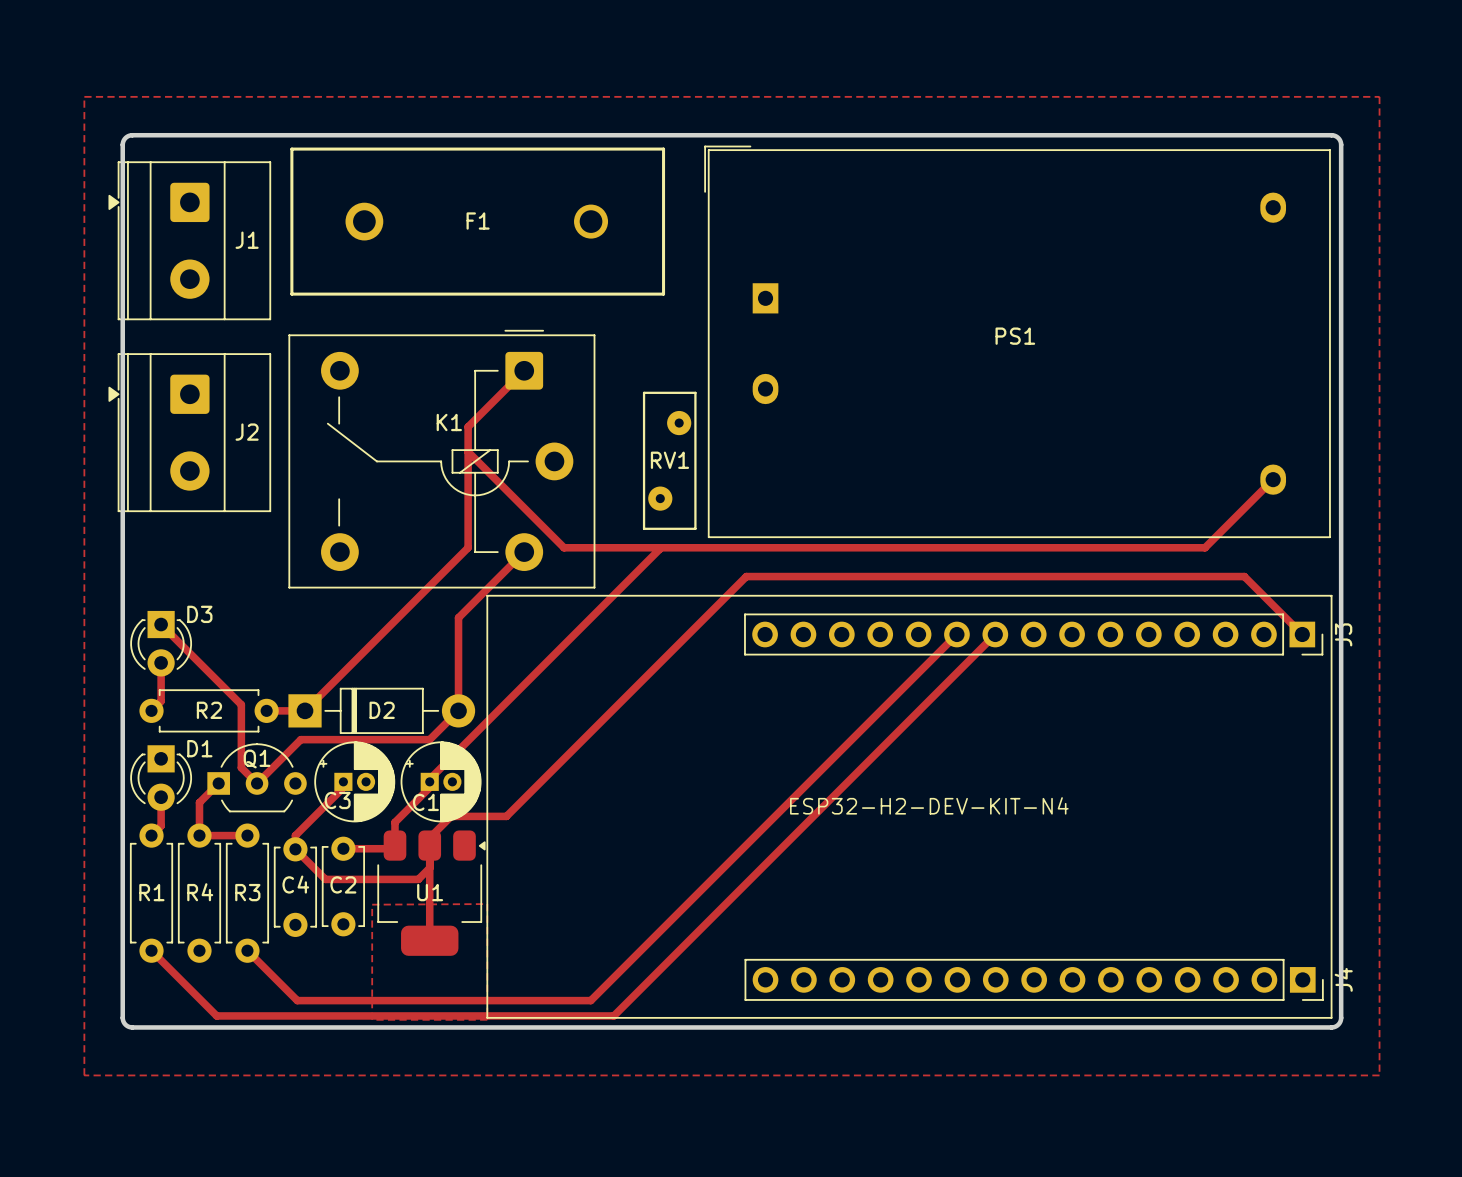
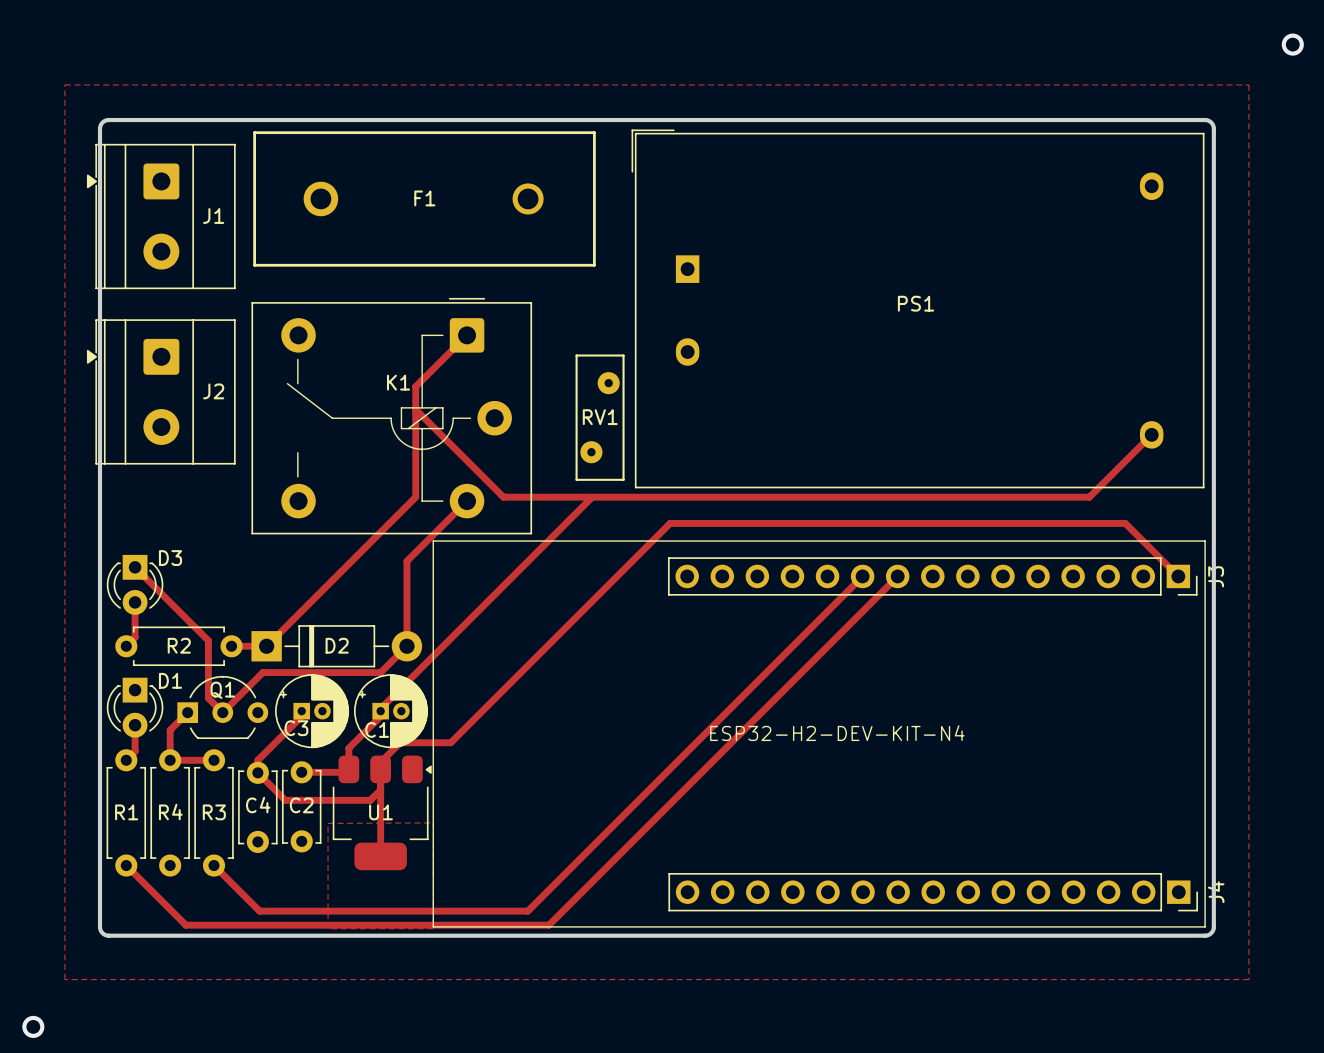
via: none -> (1292, 44)
via: none -> (33, 1026)

